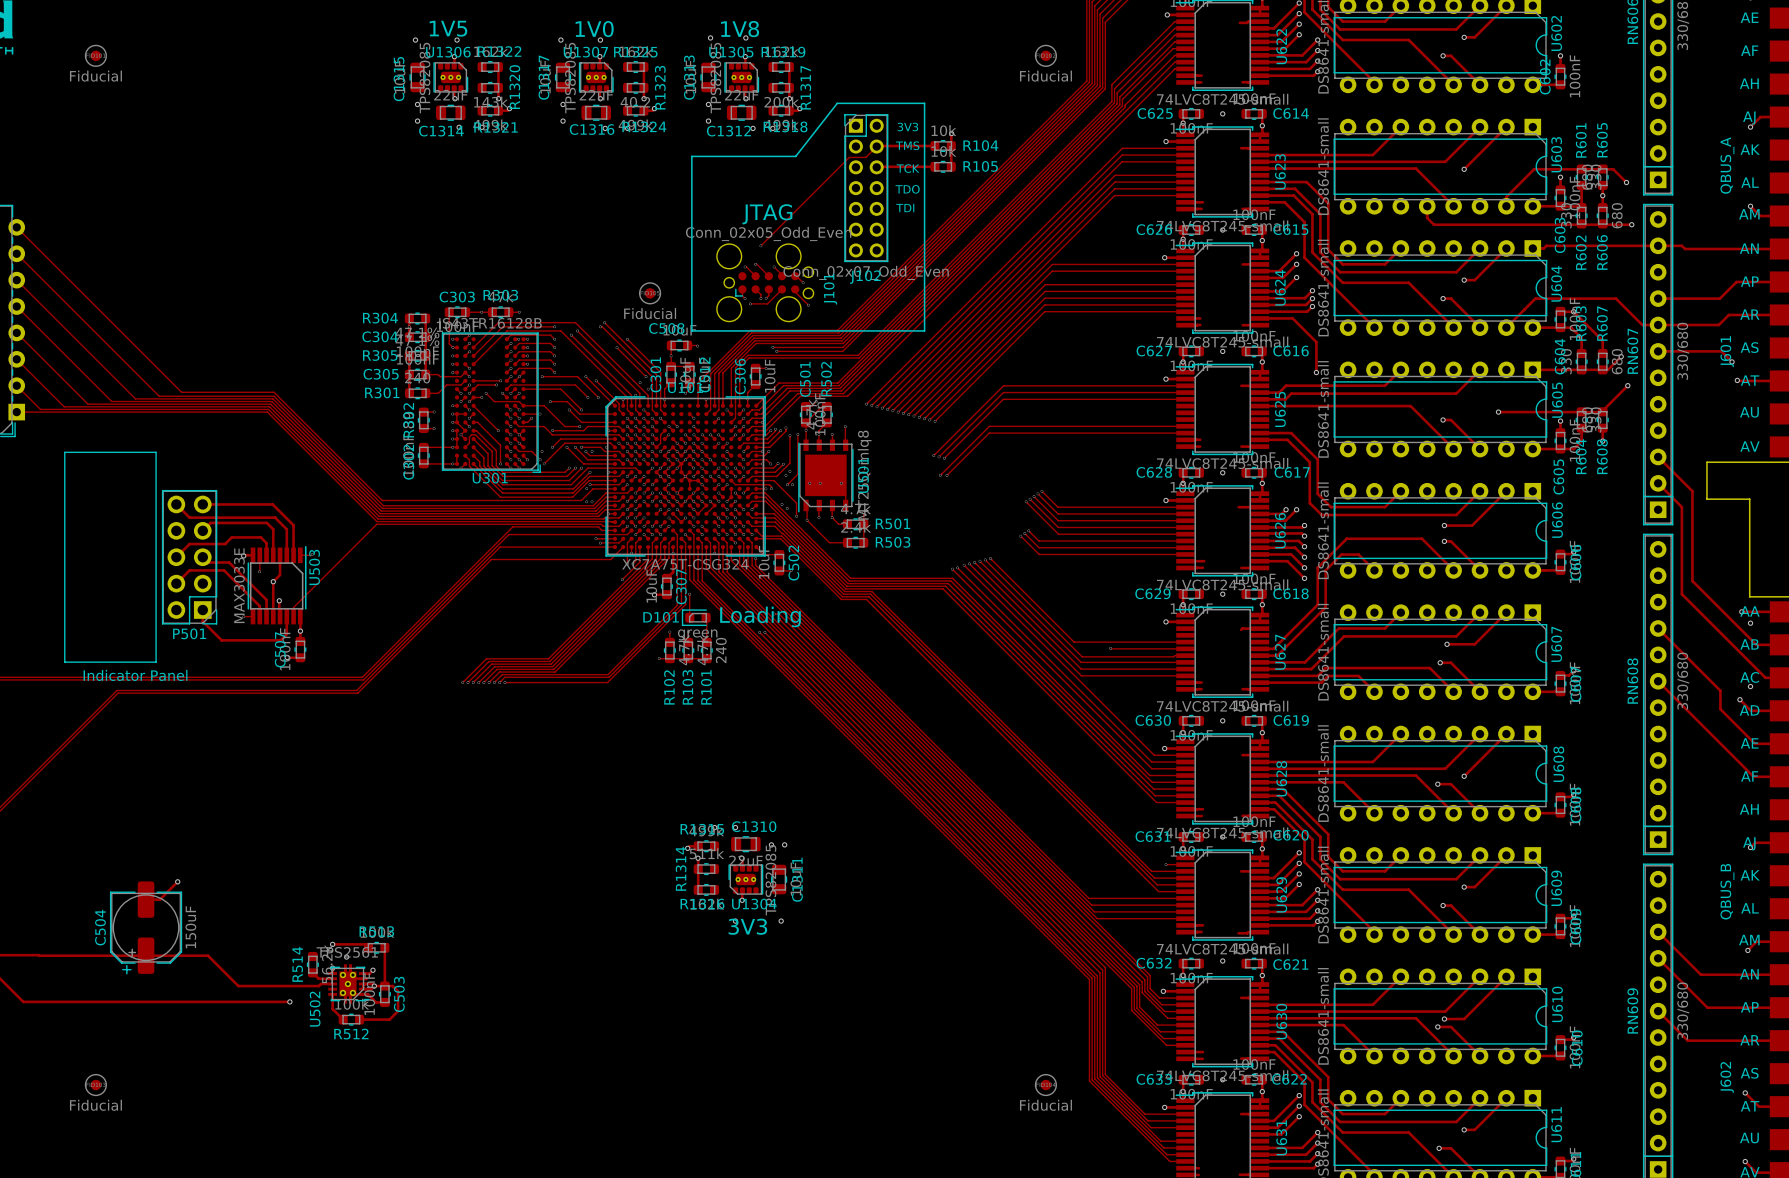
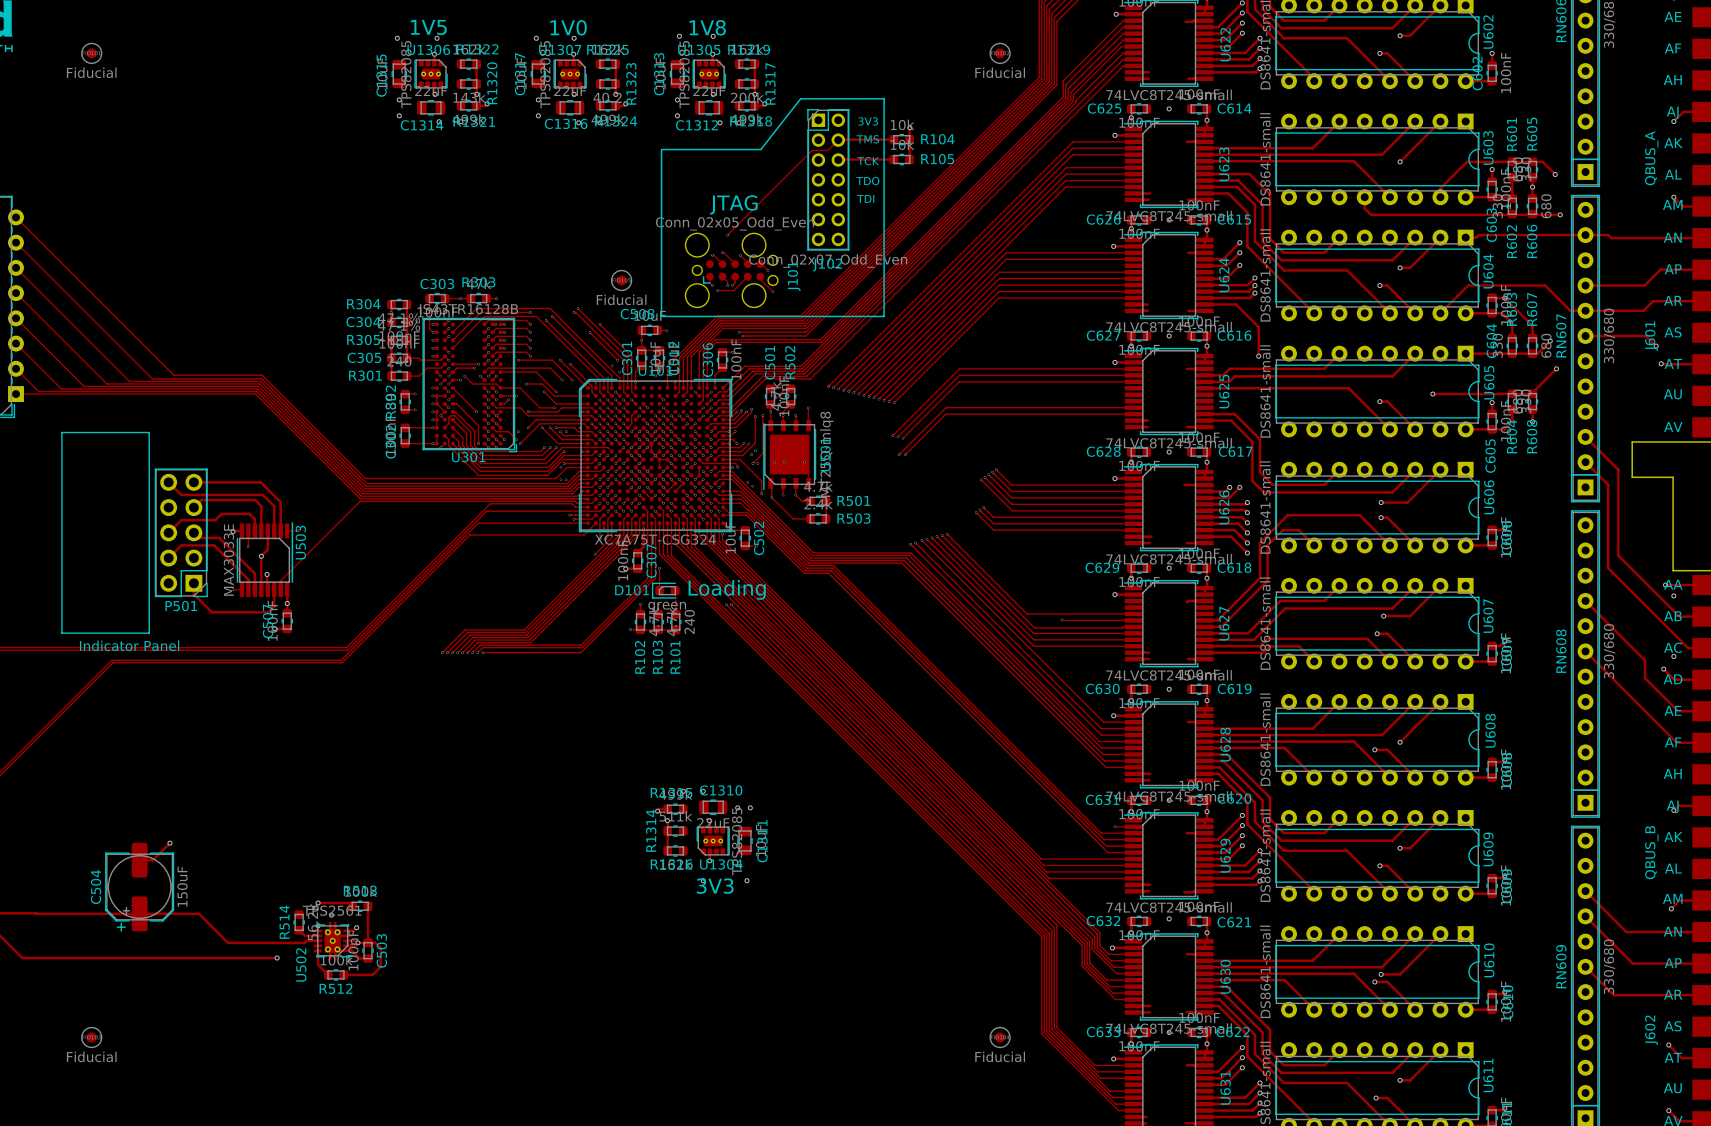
C306 value: 10uF (770, 376) -> 100nF (736, 359)
C307 value: 10uF (651, 586) -> 100nF (623, 560)

